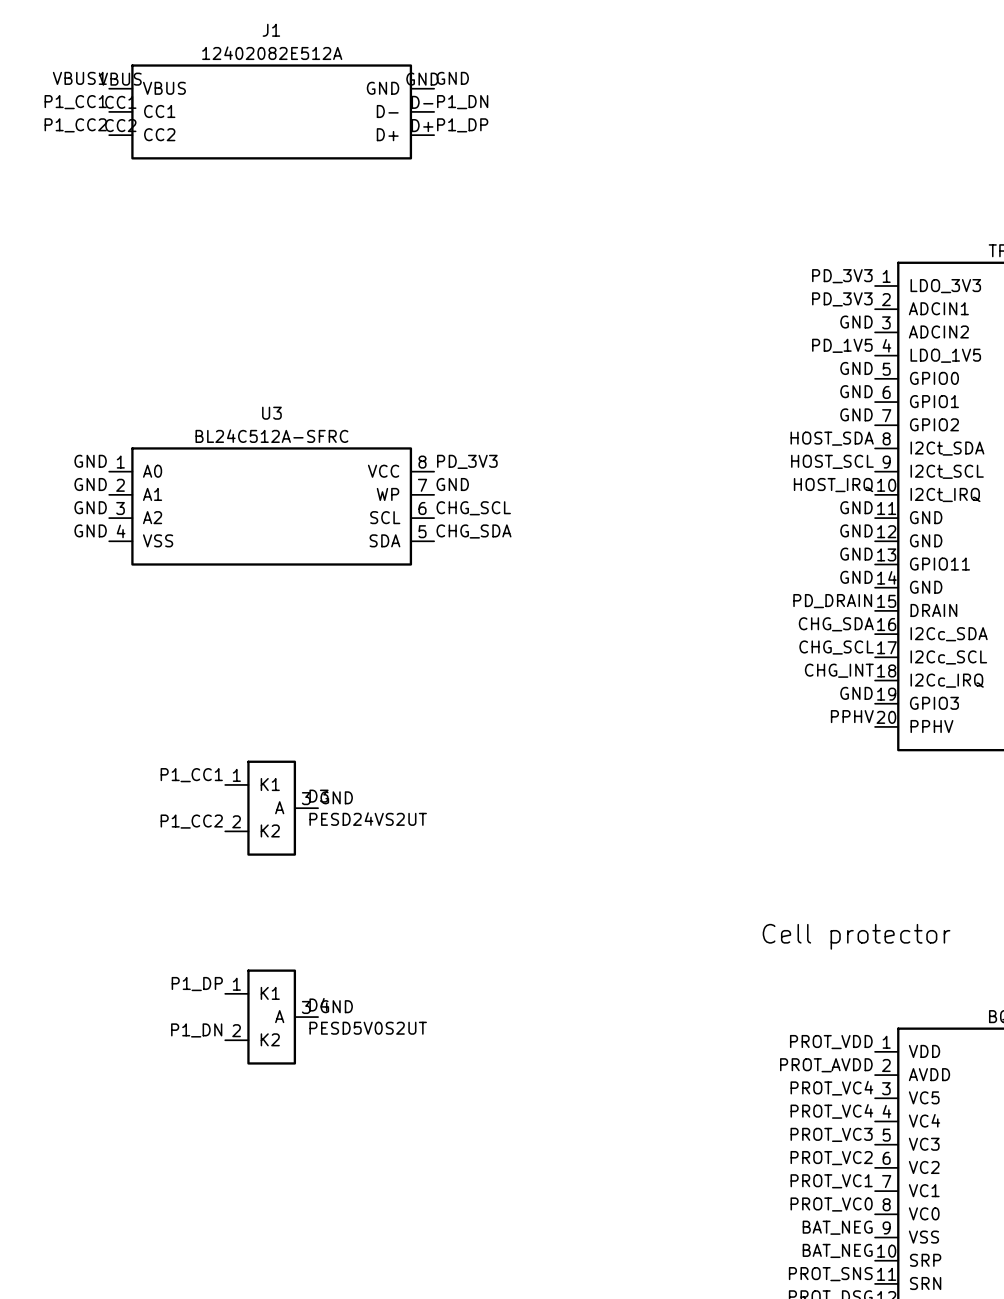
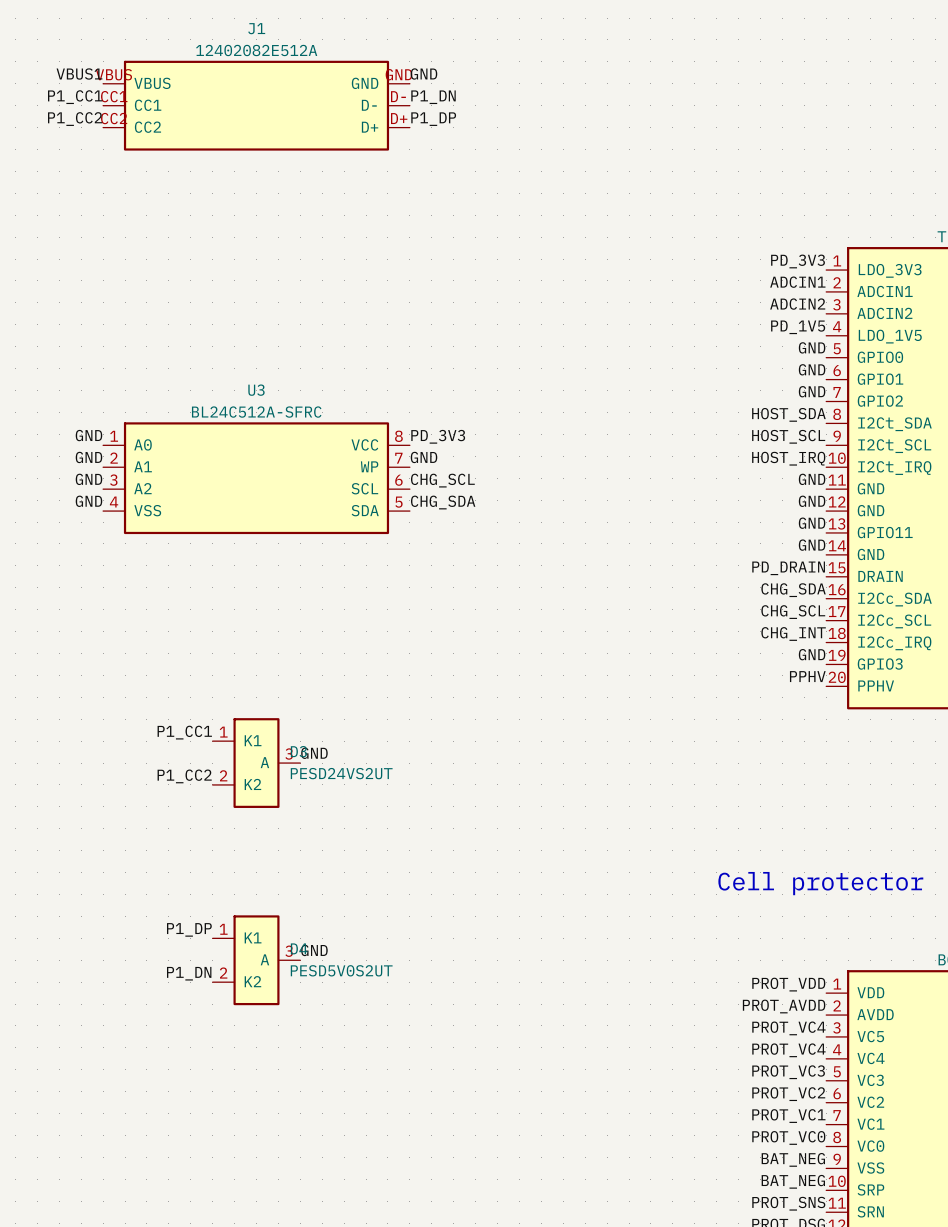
label: PD_3V3 (842, 299) -> ADCIN1 (797, 282)
label: GND (856, 322) -> ADCIN2 (797, 304)

